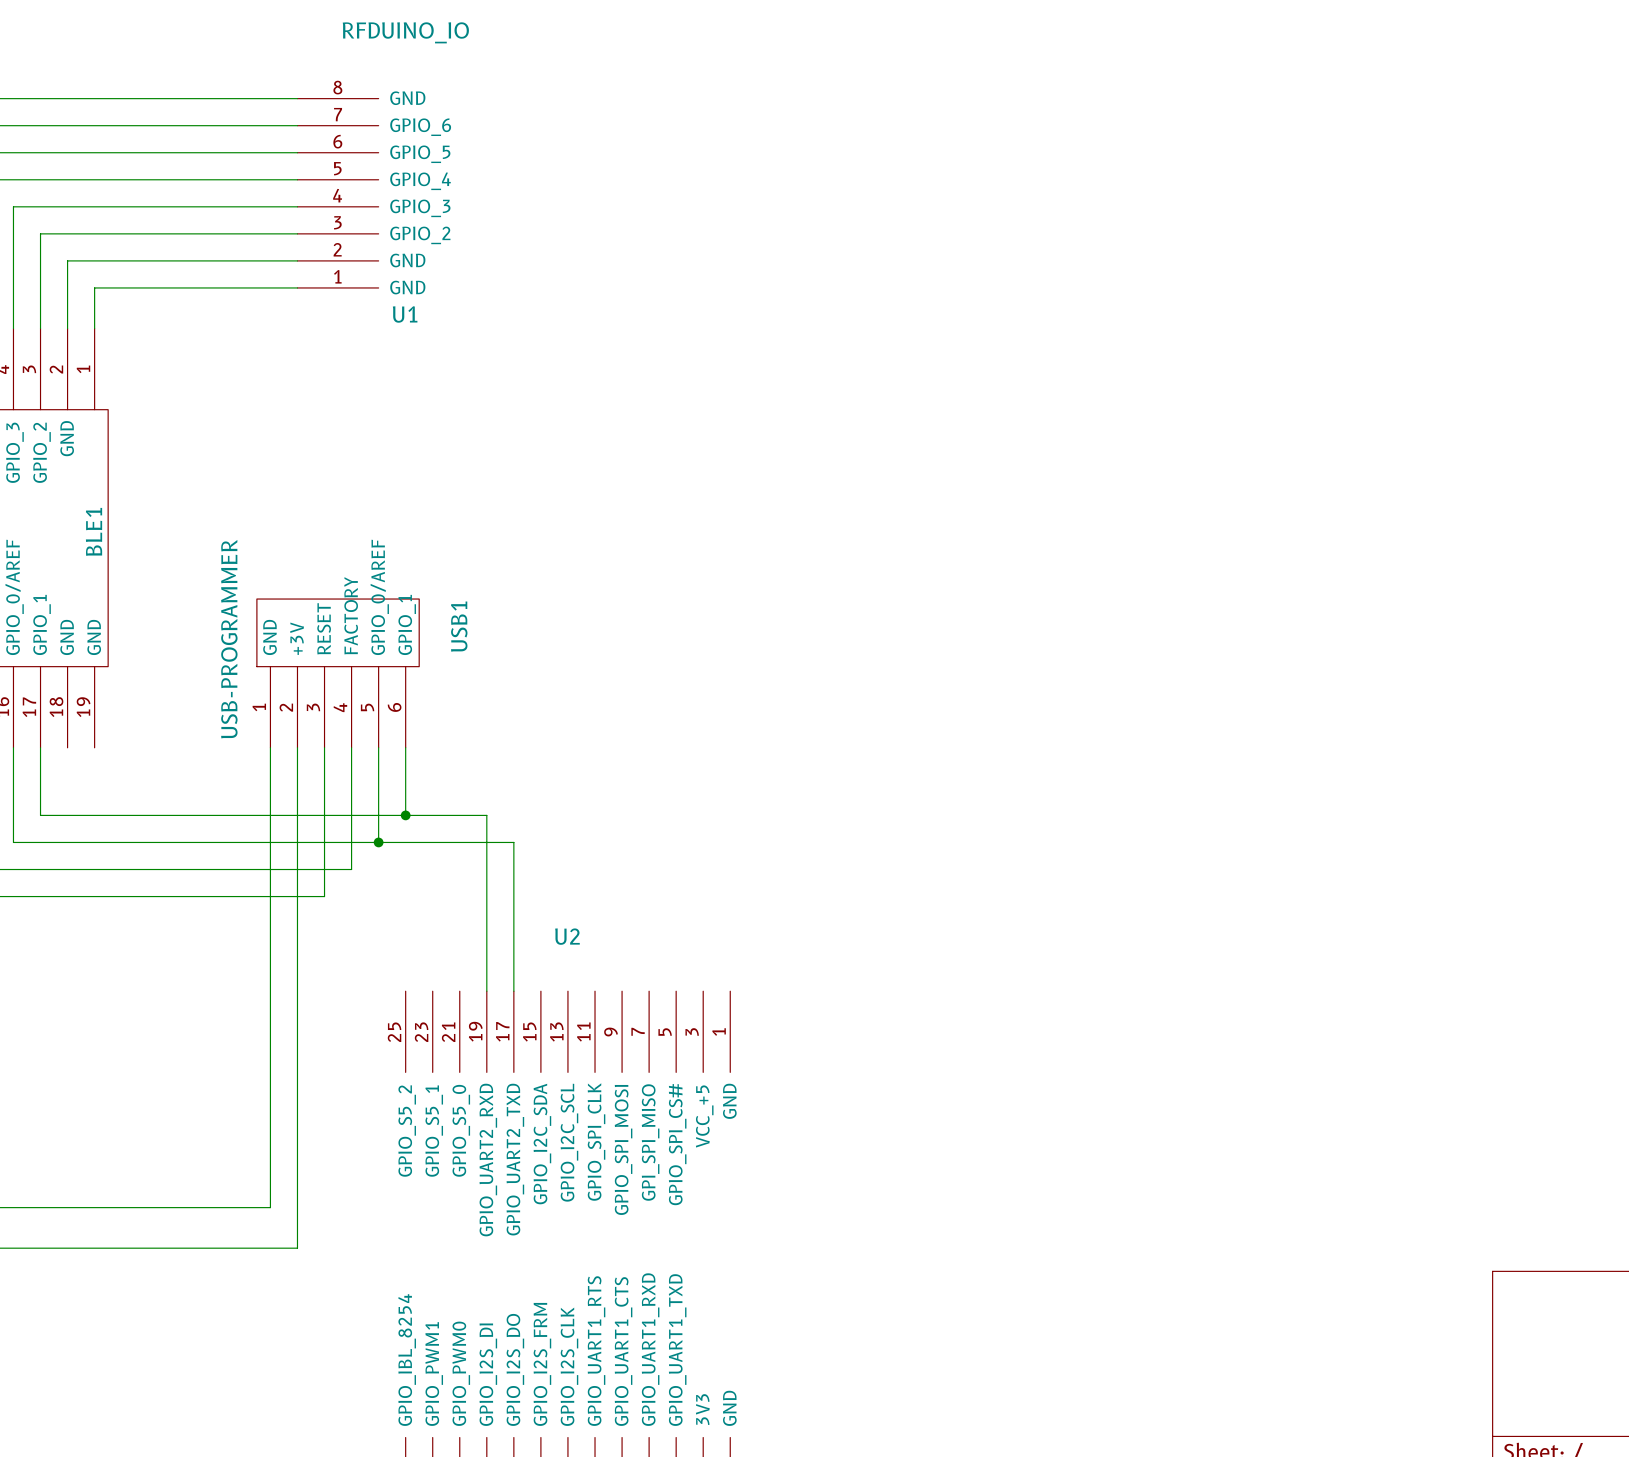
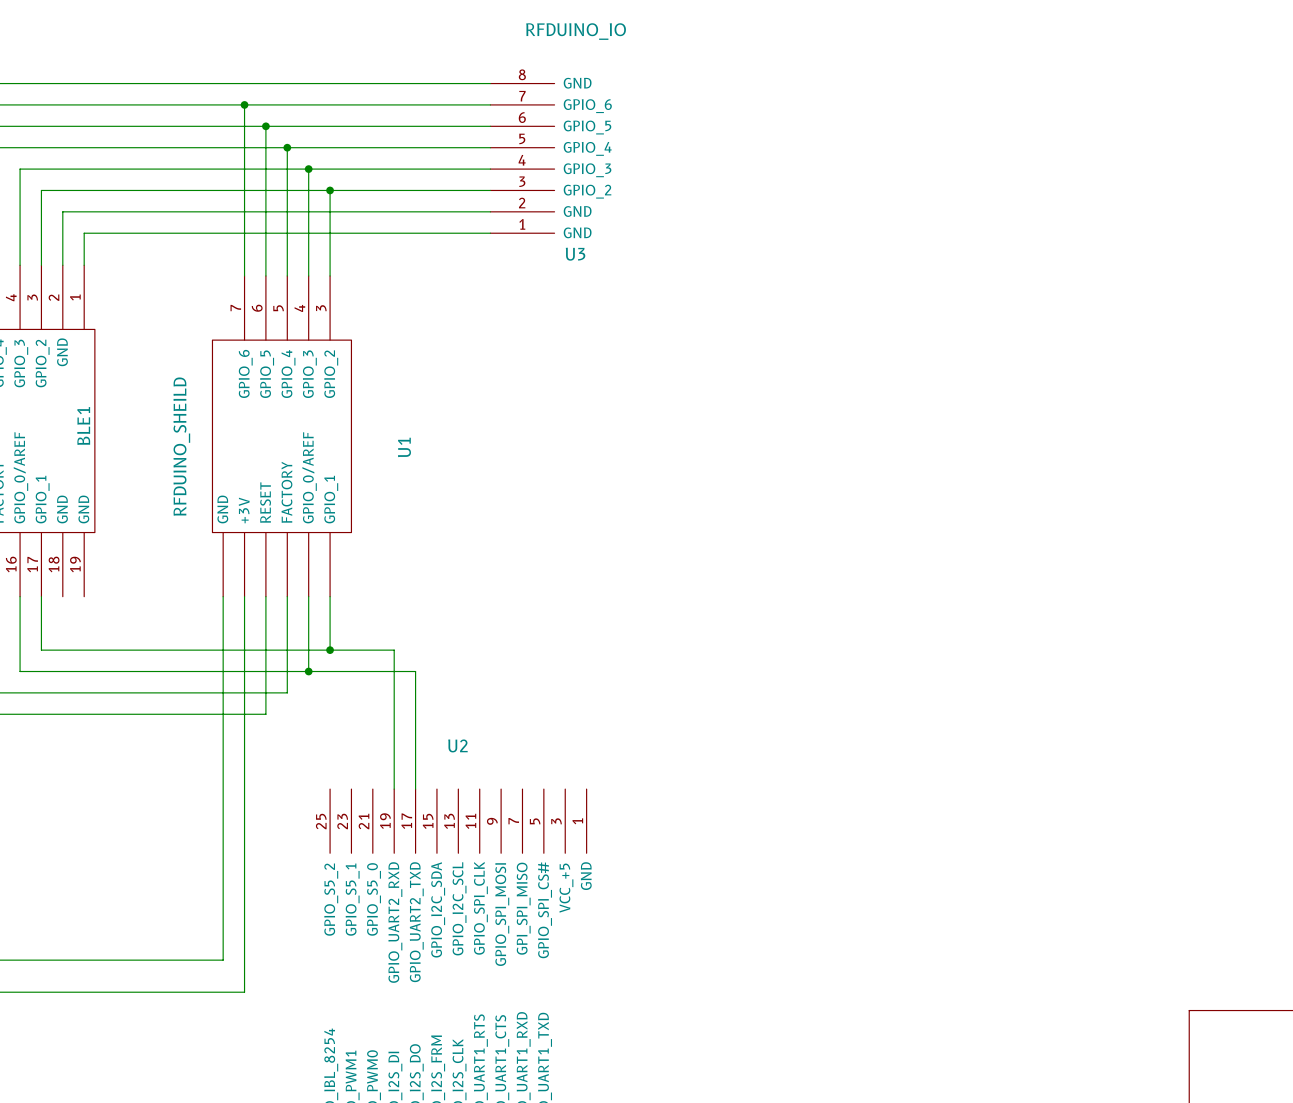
U1 value: RFDUINO_IO (405, 32) -> RFDUINO_SHEILD (181, 446)
wire: none -> (244, 83) (490, 83)
U1 symbol: [297, 98, 379, 288] -> [212, 275, 352, 597]
junction: none -> (244, 104)
wire: none -> (490, 104) (244, 104) (244, 275)
wire: none -> (244, 126) (490, 126)
wire: none -> (265, 126) (265, 275)
junction: none -> (265, 126)
wire: none -> (244, 147) (490, 147)
wire: none -> (287, 147) (287, 275)
junction: none -> (287, 147)
U3: none -> RFDUINO_IO (522, 158)
wire: none -> (244, 169) (490, 169)
wire: none -> (308, 169) (308, 275)
junction: none -> (308, 169)
wire: none -> (244, 190) (490, 190)
wire: none -> (330, 190) (330, 275)
junction: none -> (330, 190)
wire: none -> (244, 211) (490, 211)
wire: none -> (244, 233) (490, 233)
U1 name position: U1 (405, 314) -> U1 (404, 447)
USB1: USB-PROGRAMMER (338, 673) -> none

